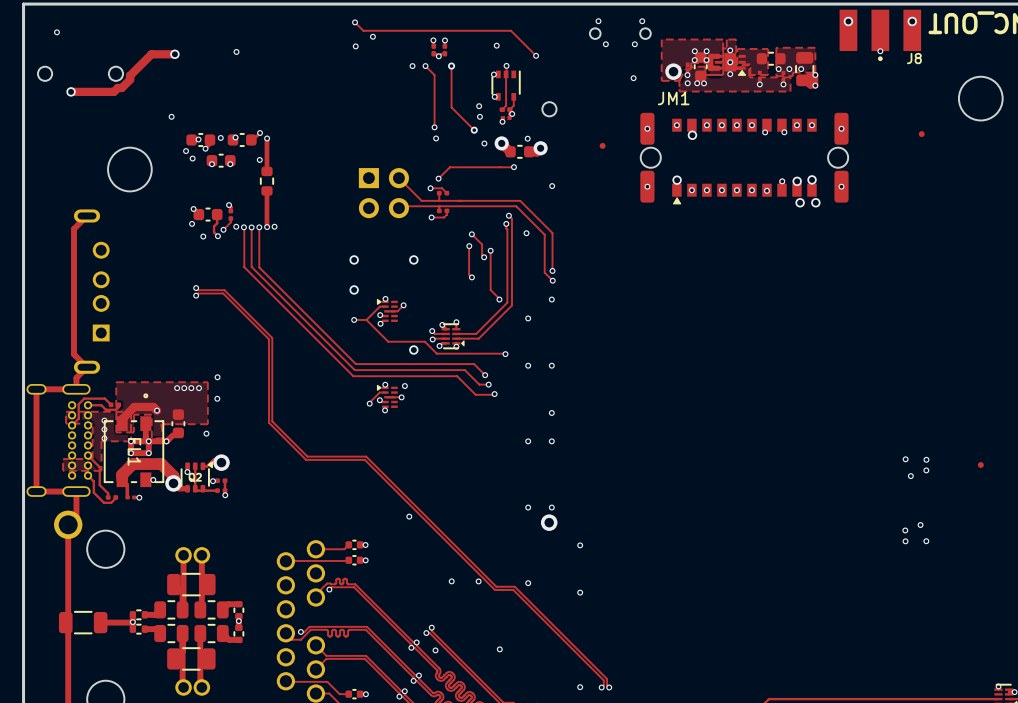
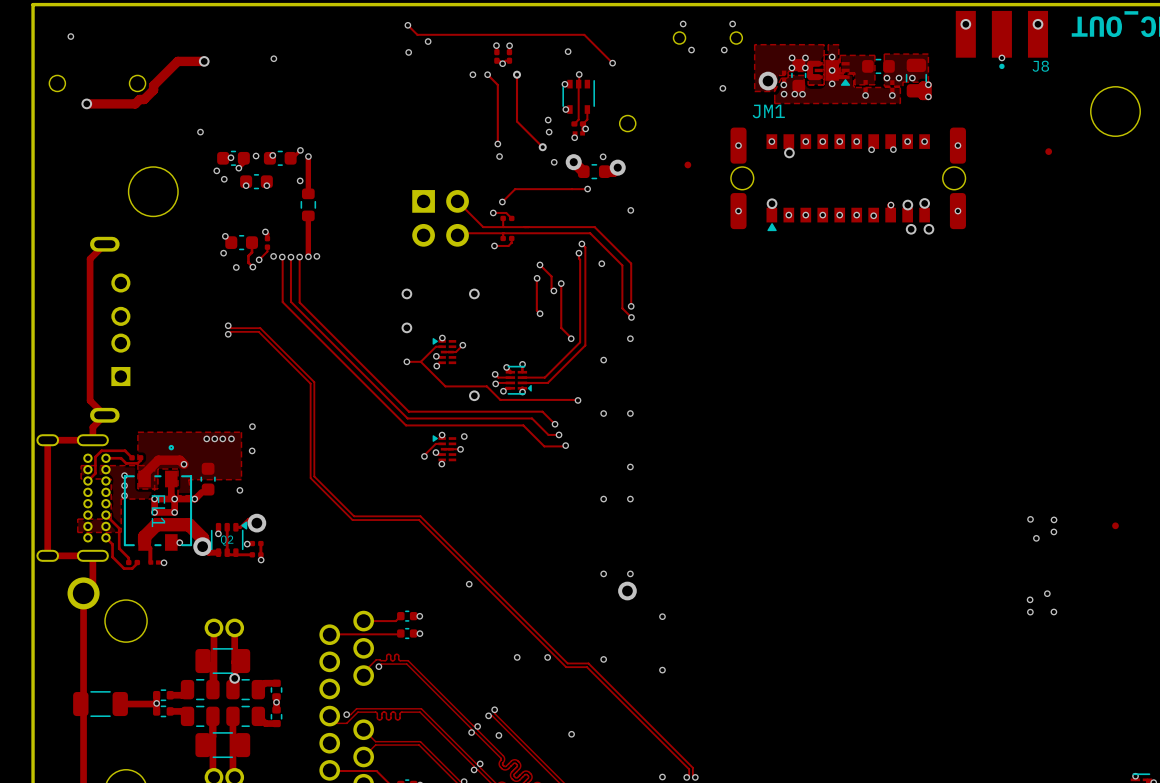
via: none -> (234, 678)

